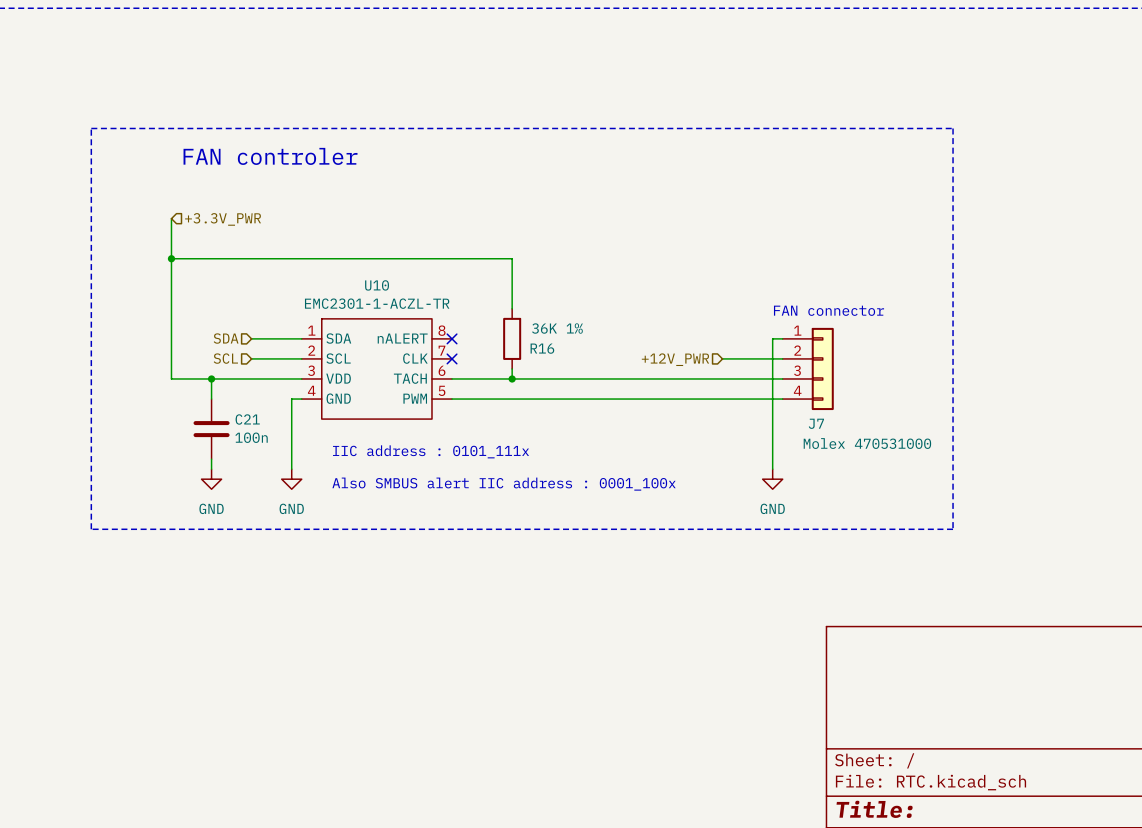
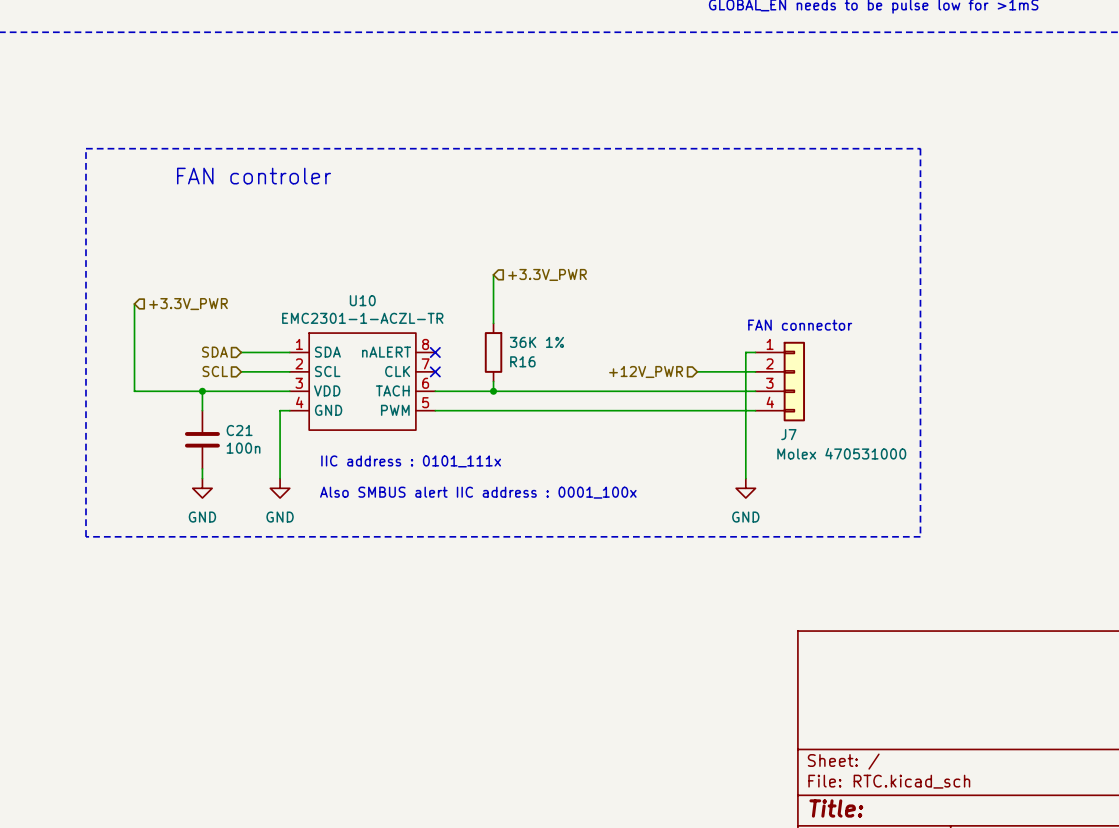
wire: (171, 218) (171, 378) -> (134, 303) (134, 391) (163, 391)
hierarchical label position: +3.3V_PWR (223, 219) -> +3.3V_PWR (188, 304)
wire: (171, 258) (512, 258) -> none
junction: (171, 258) -> none
hierarchical label: none -> +3.3V_PWR (547, 274)

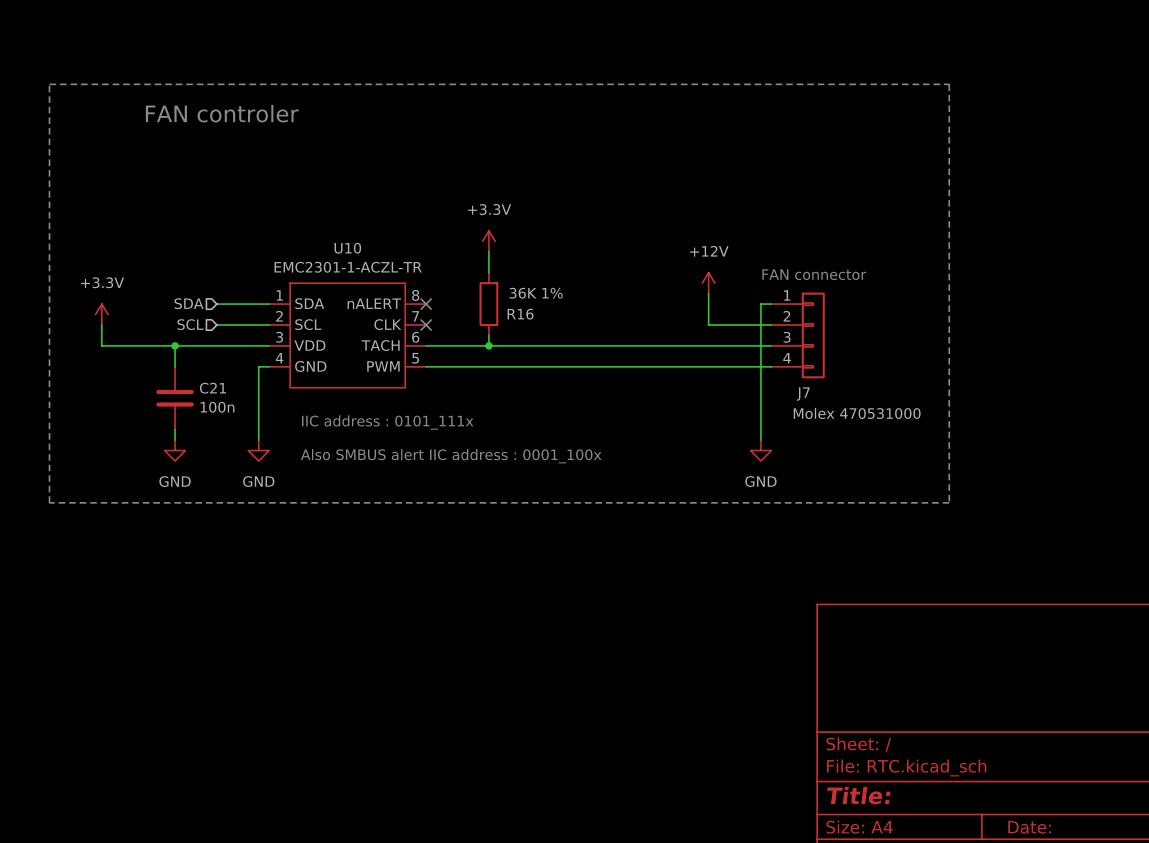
hierarchical label: +3.3V_PWR (547, 274) -> none
power symbol: none -> +3.3V (488, 241)
wire: (134, 303) (134, 371) -> none
hierarchical label: +3.3V_PWR (188, 304) -> none
power symbol: none -> +12V (708, 283)
wire: none -> (708, 293) (708, 325)
power symbol: none -> +3.3V (101, 314)
hierarchical label: +12V_PWR (646, 371) -> none

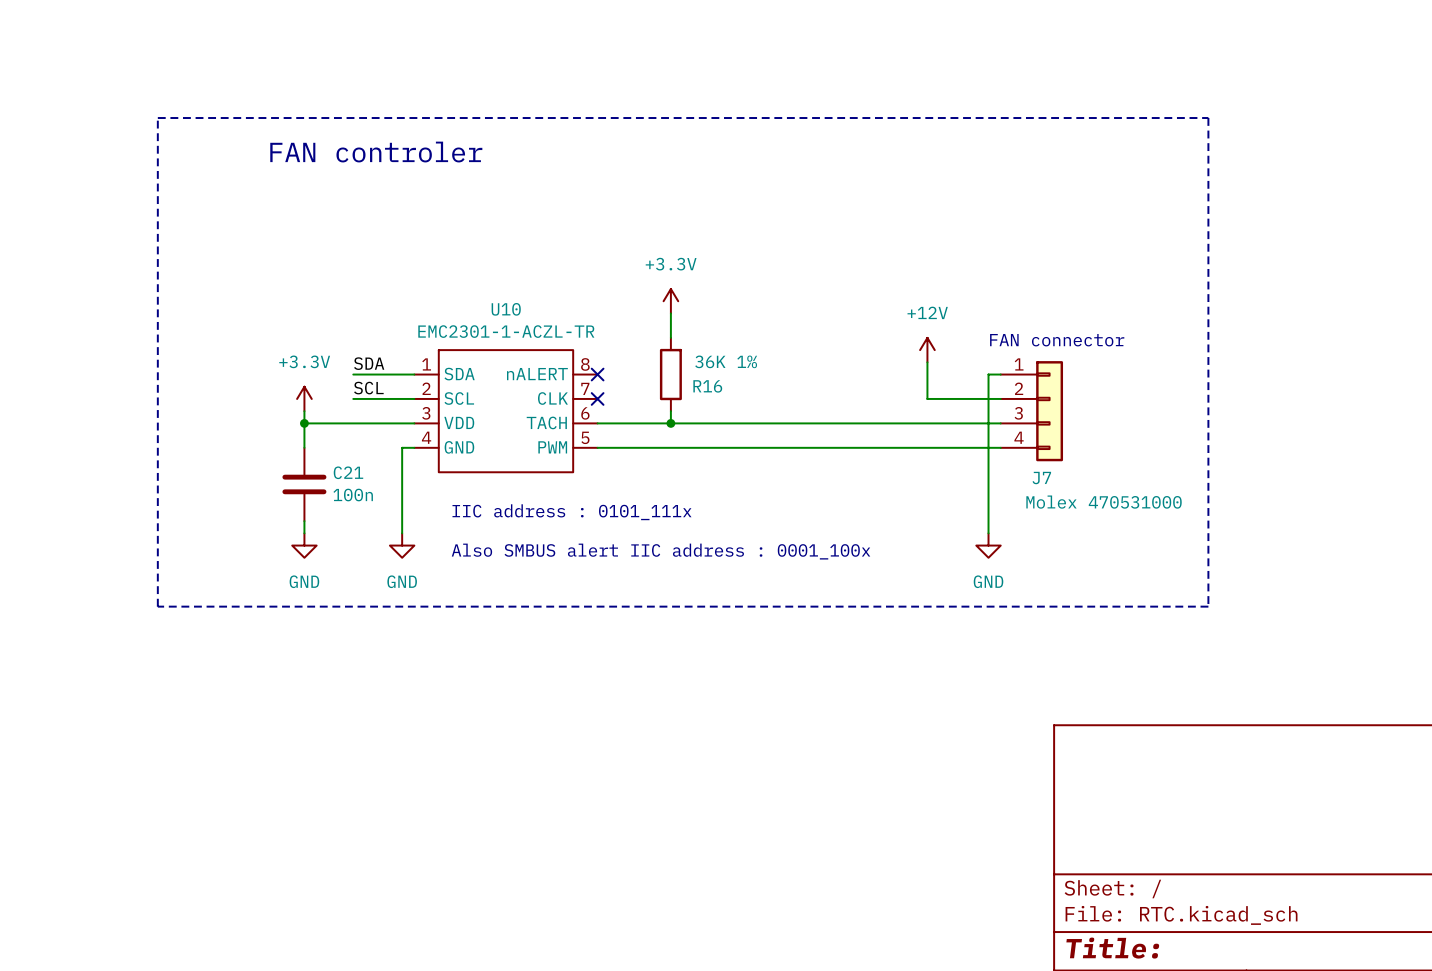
label: none -> SDA (369, 363)
hierarchical label: SDA (189, 303) -> none
power symbol position: +3.3V (101, 314) -> +3.3V (304, 398)
label: none -> SCL (368, 388)
hierarchical label: SCL (190, 324) -> none
wire: (101, 325) (101, 345) (175, 345) -> (304, 411) (304, 423)

